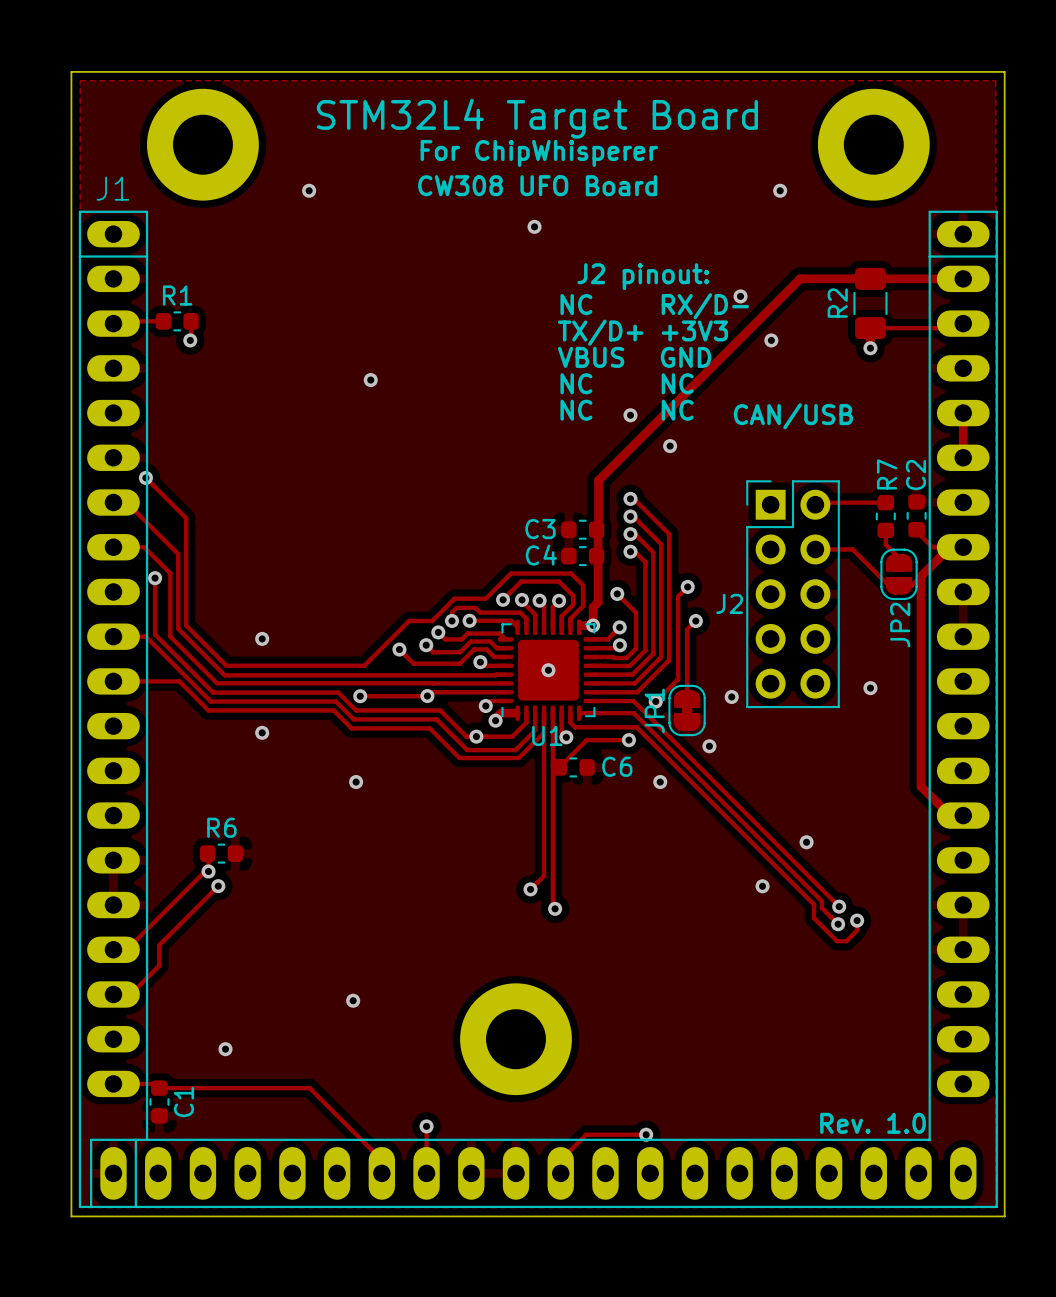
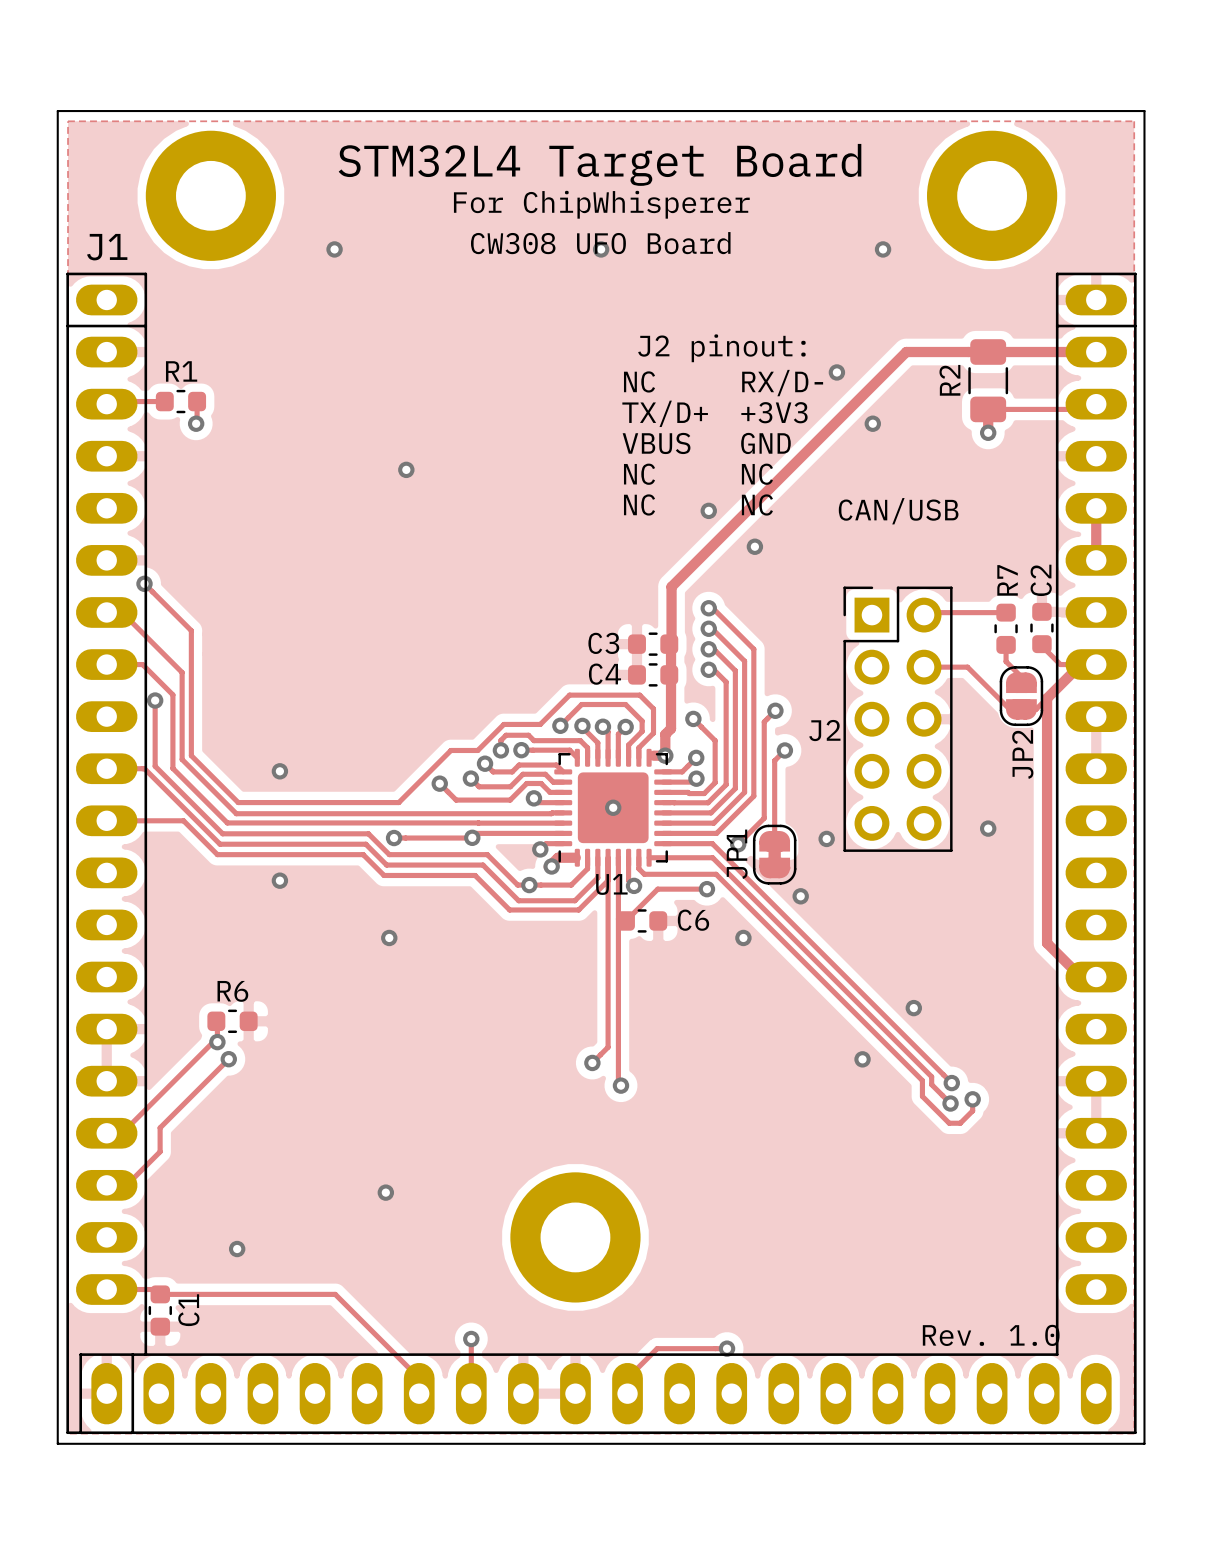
via position: (534, 226) -> (601, 249)

